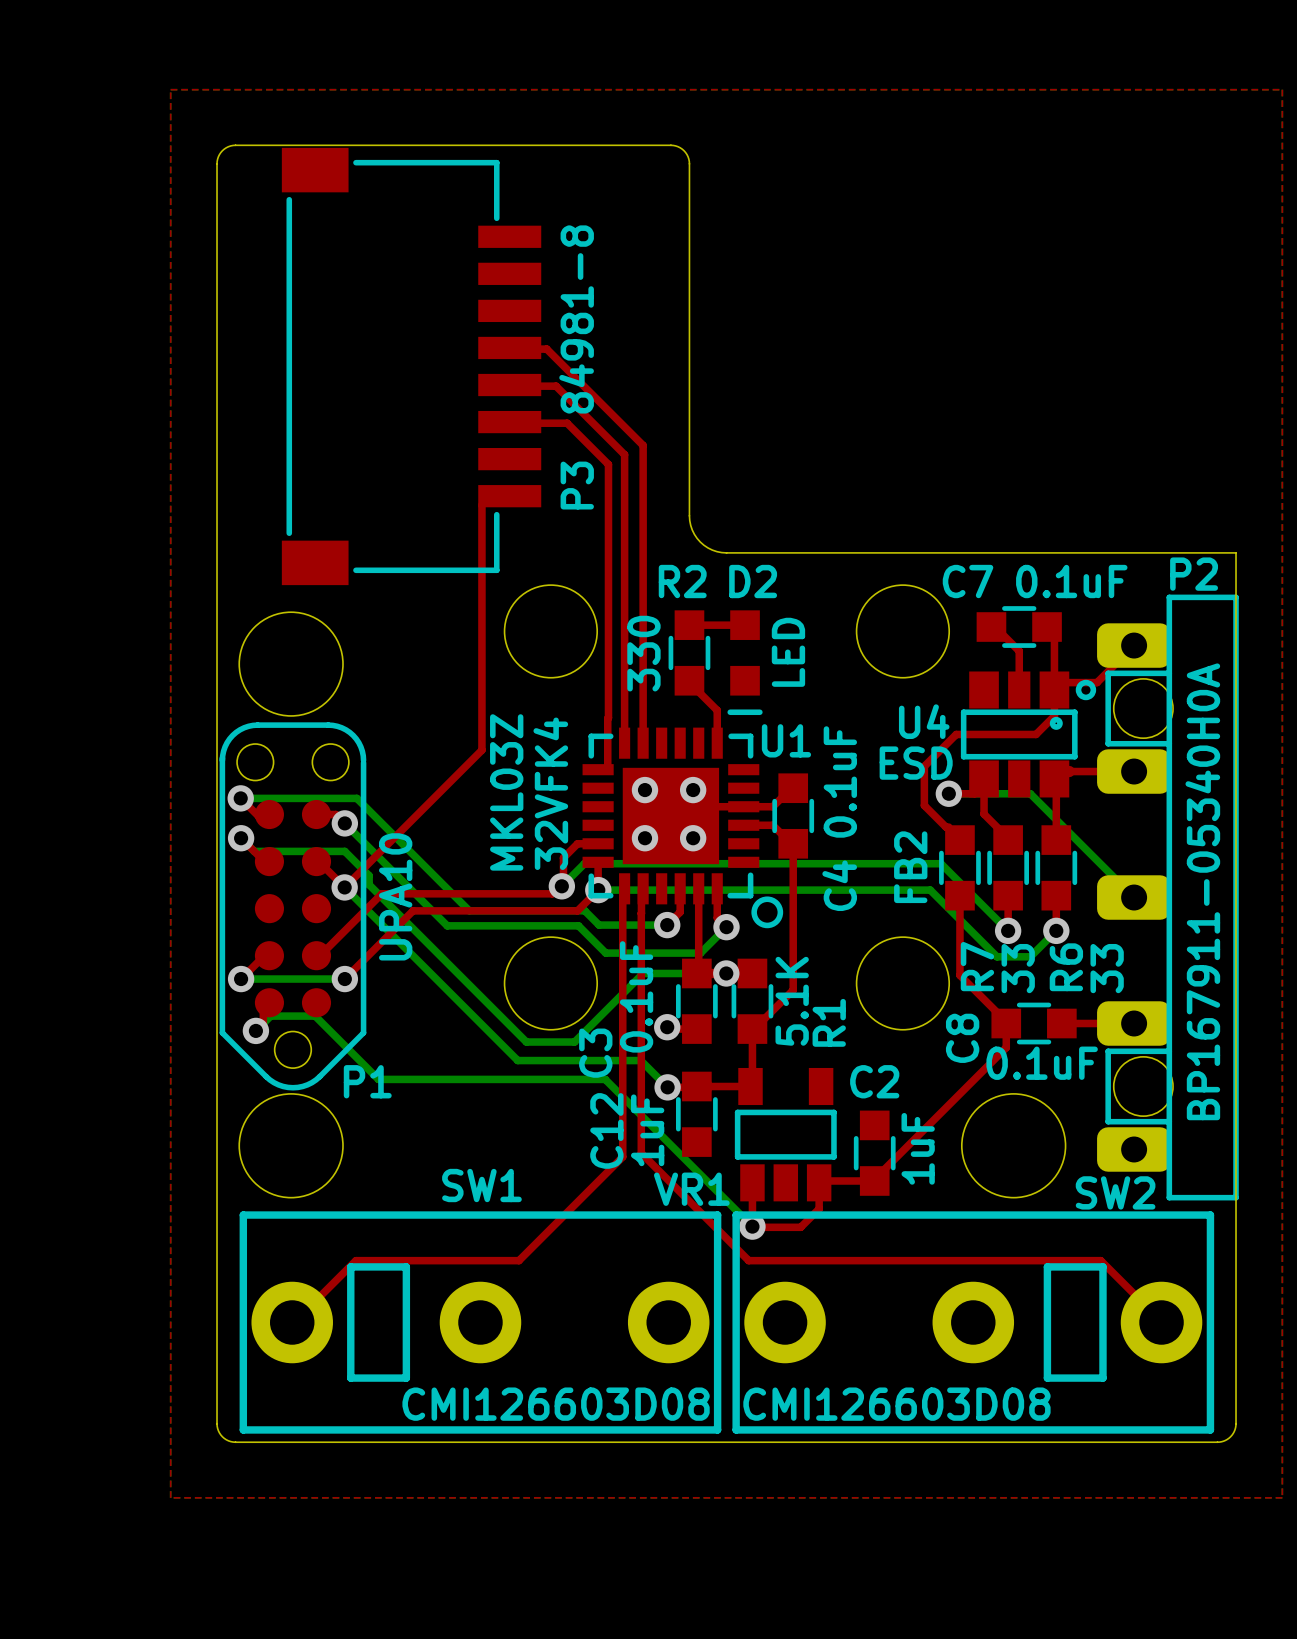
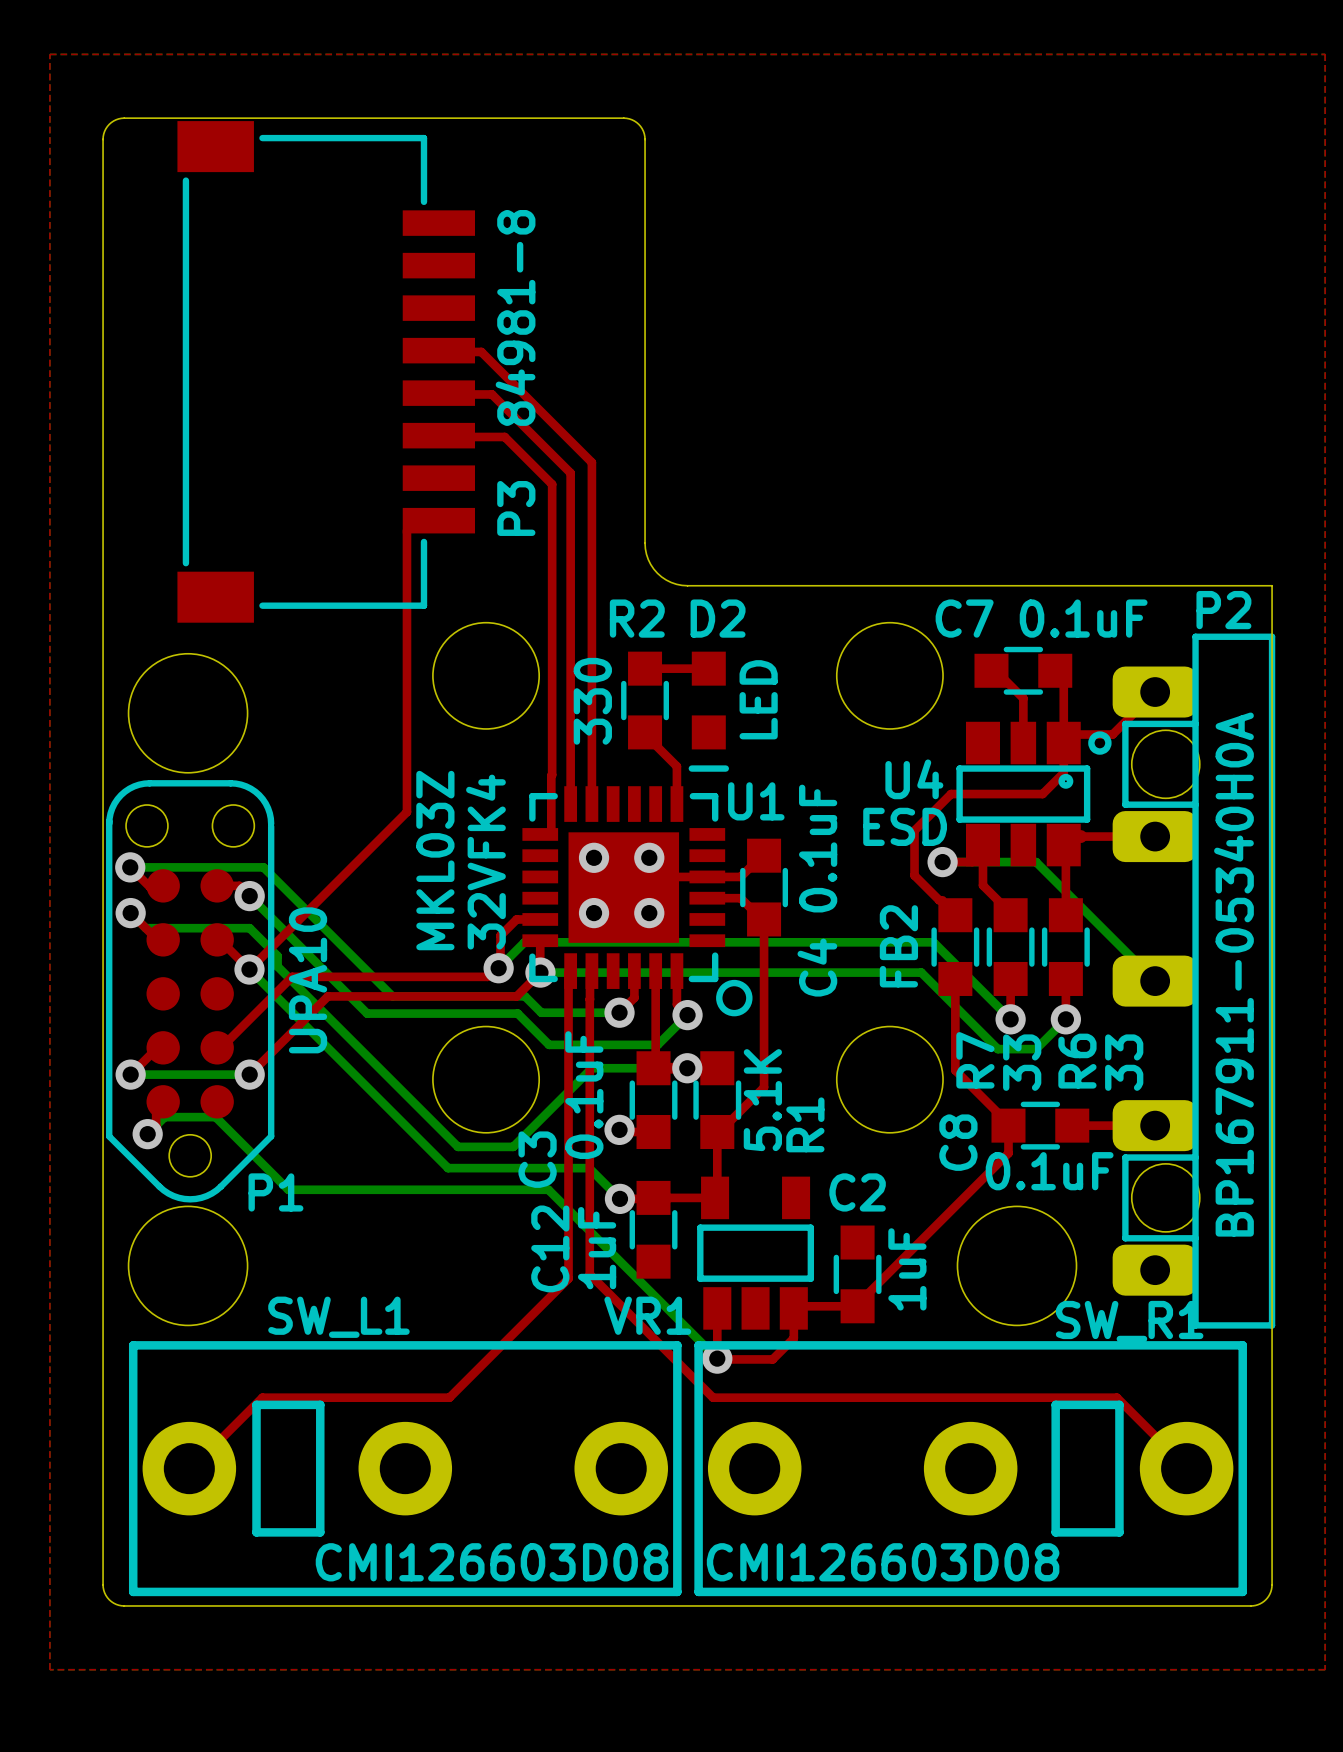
SW1 name: SW1 (481, 1185) -> SW_L1 (338, 1317)
SW2 name: SW2 (1115, 1192) -> SW_R1 (1129, 1321)

